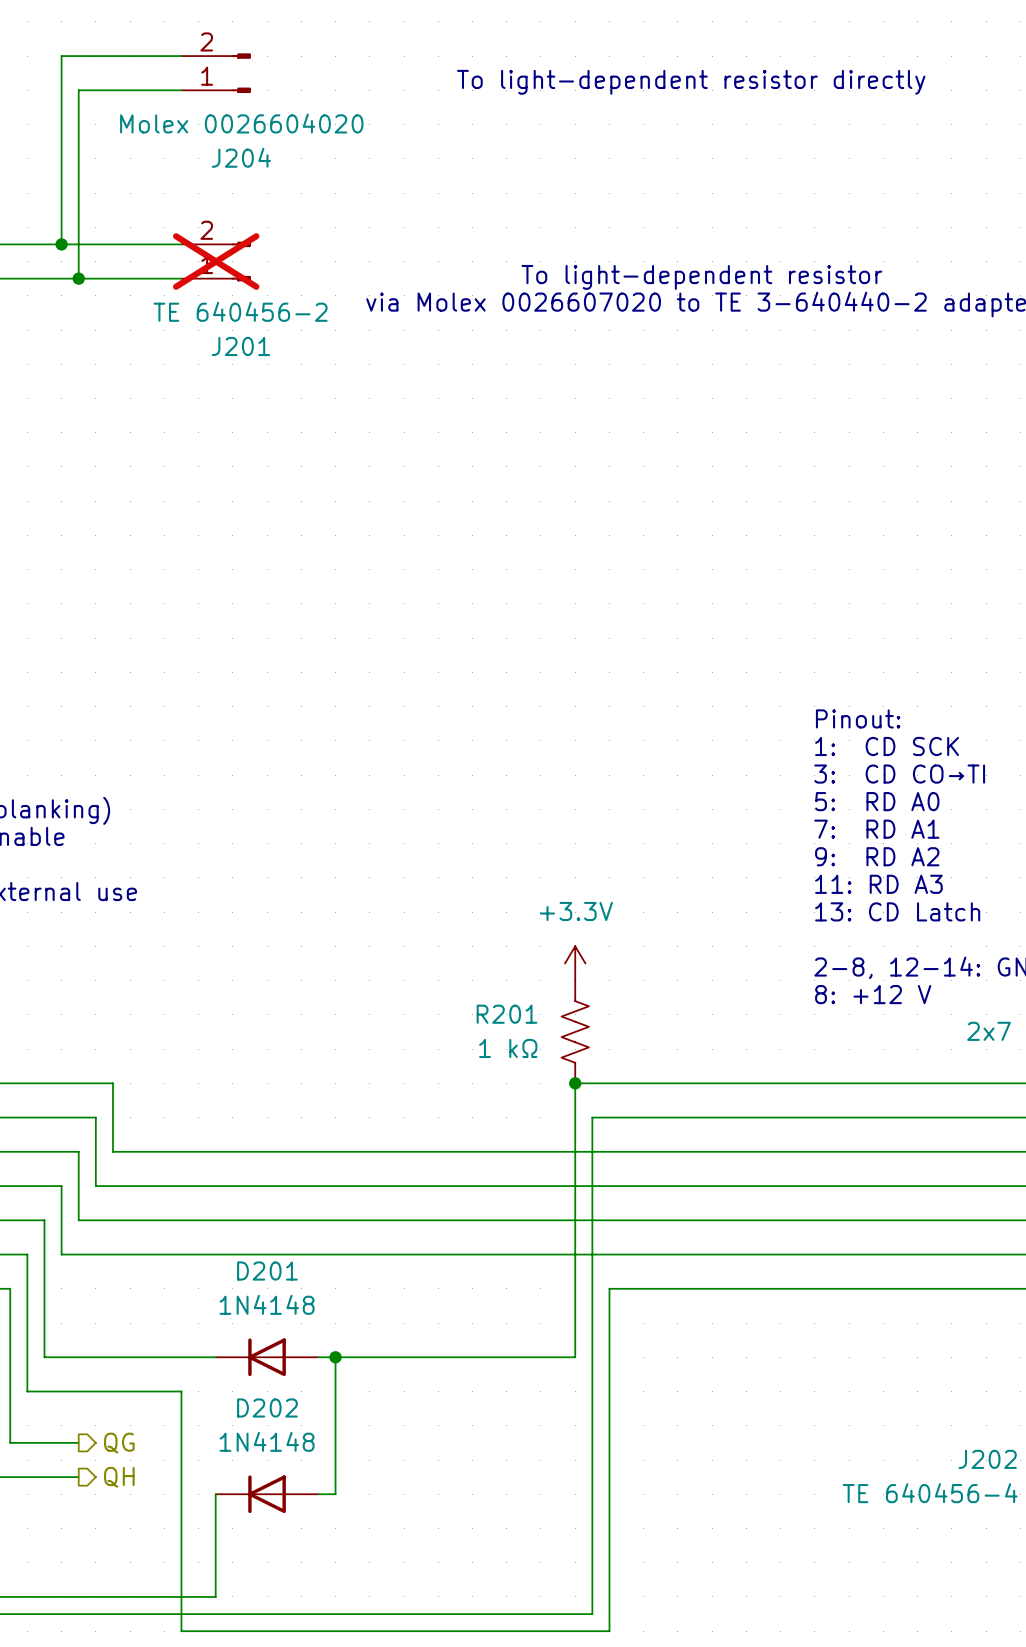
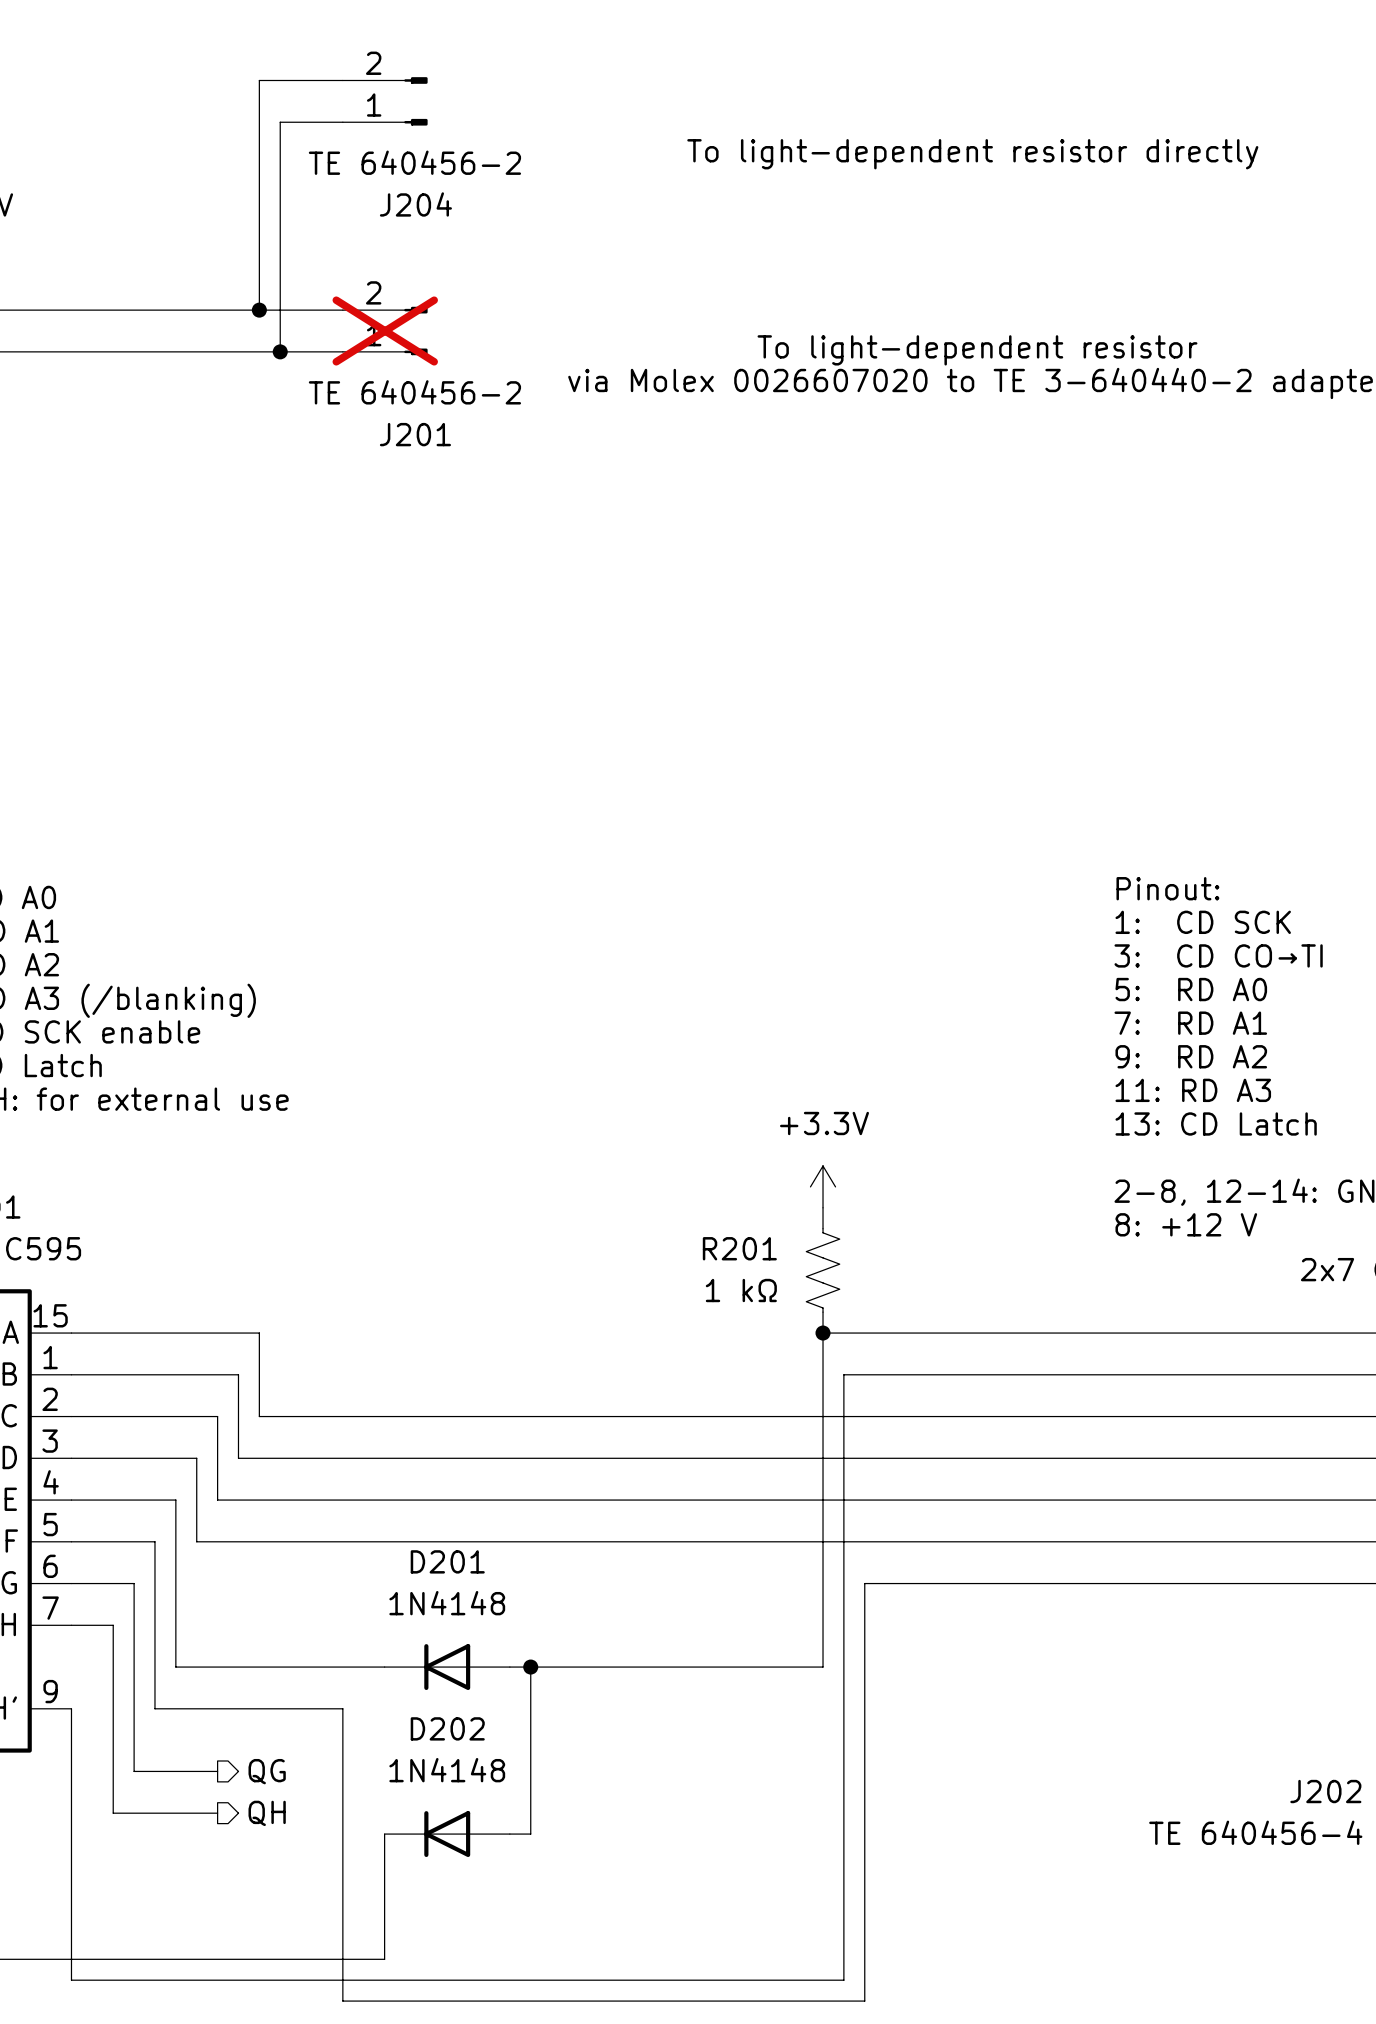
wire: (112, 56) (61, 56) (61, 244) -> (259, 80) (259, 310)
text position: To light-dependent resistor directly (691, 82) -> To light-dependent resistor directly (972, 154)
wire: (130, 90) (78, 90) (78, 278) -> (280, 122) (280, 351)
J204 value: Molex 0026604020 (241, 123) -> TE 640456-2 (414, 162)
junction: (61, 244) -> none
junction: none -> (259, 310)
junction: (78, 278) -> none
junction: none -> (280, 351)

